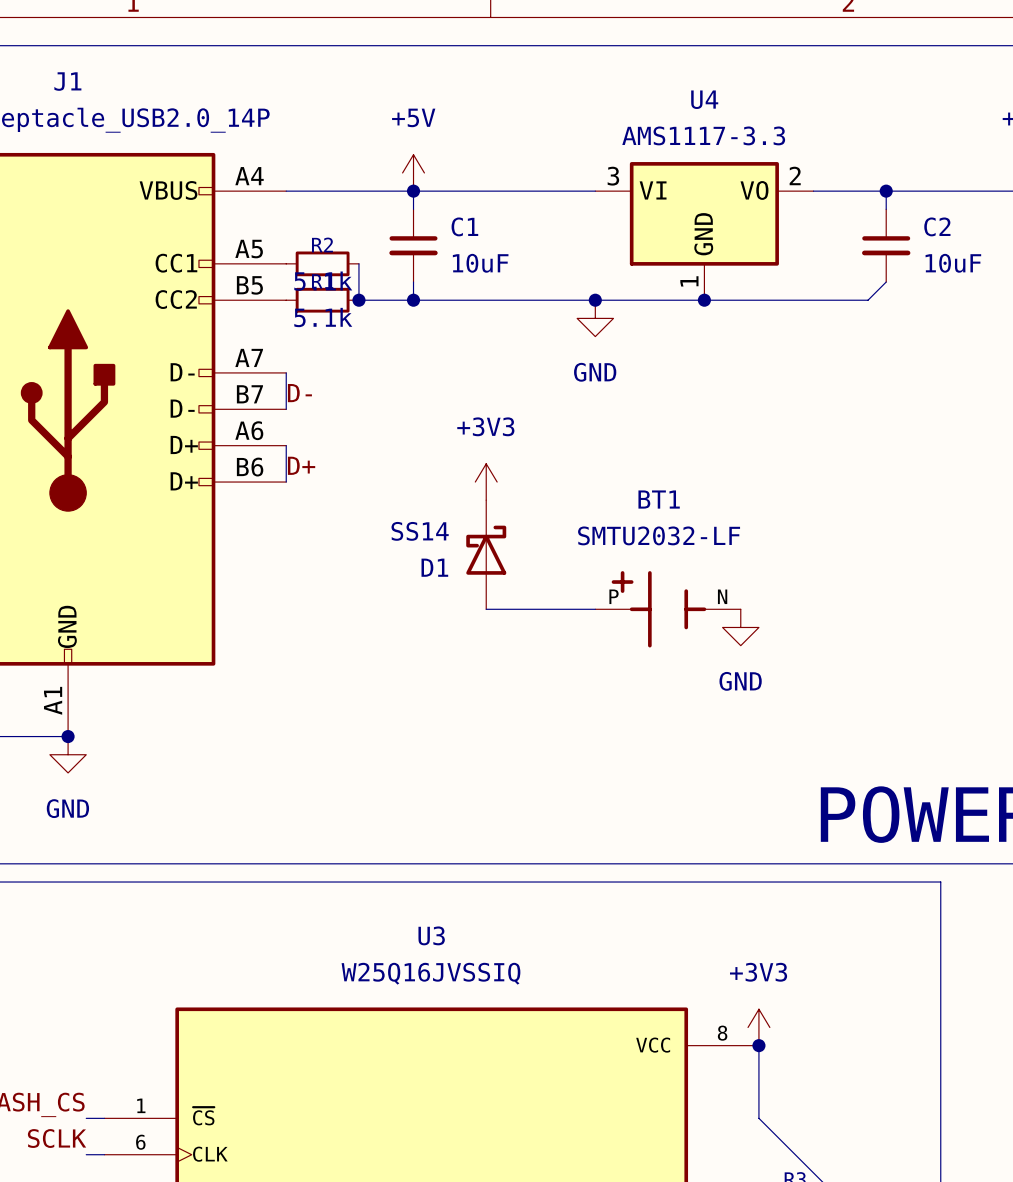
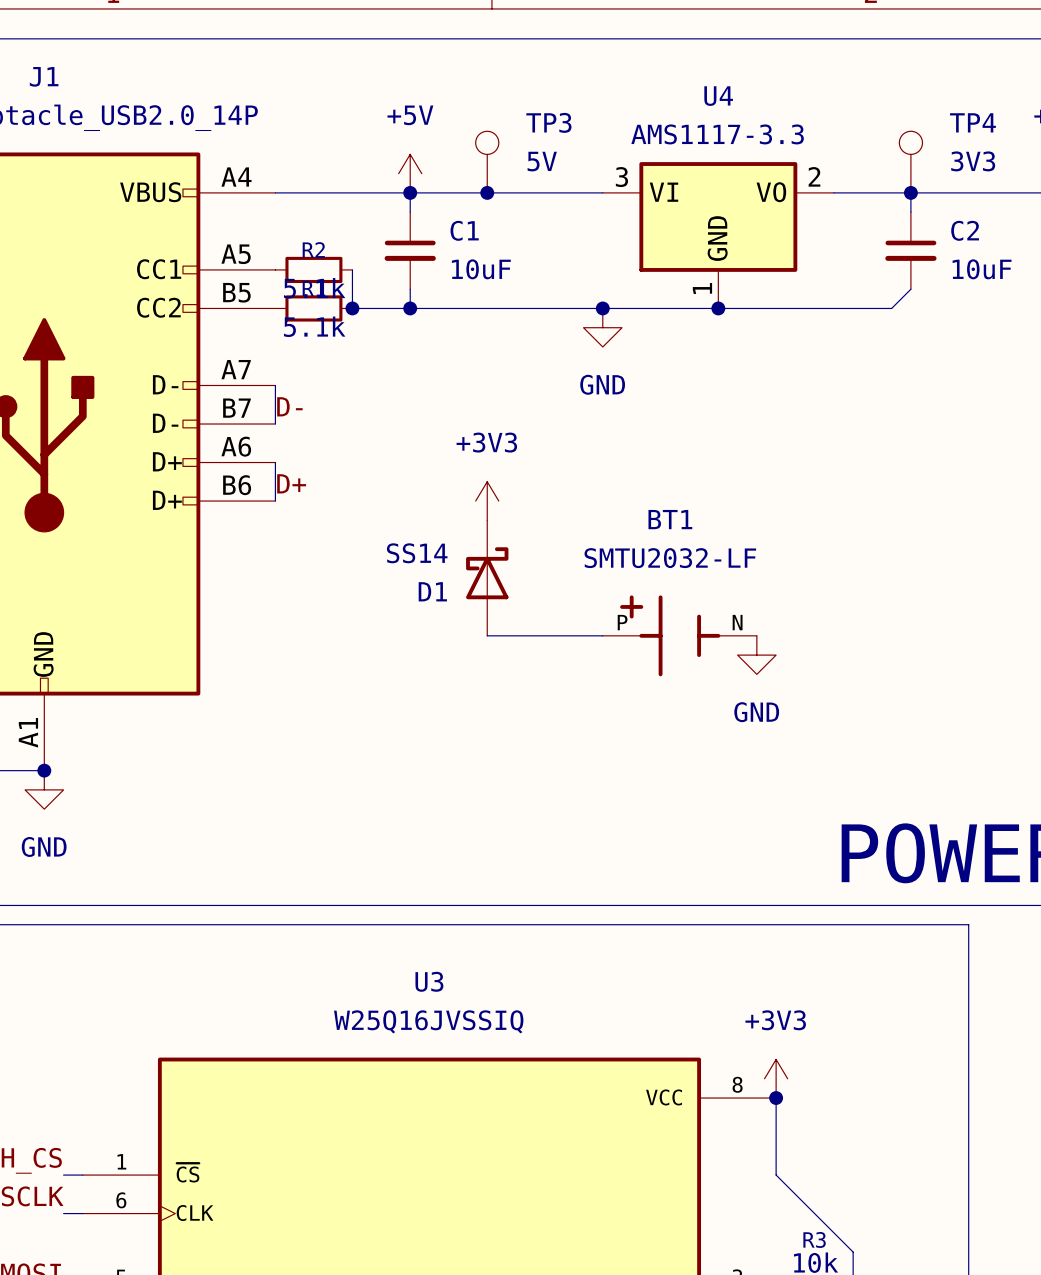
TP3: none -> 5V (487, 162)
TP4: none -> 3V3 (910, 162)
junction: none -> (487, 192)

